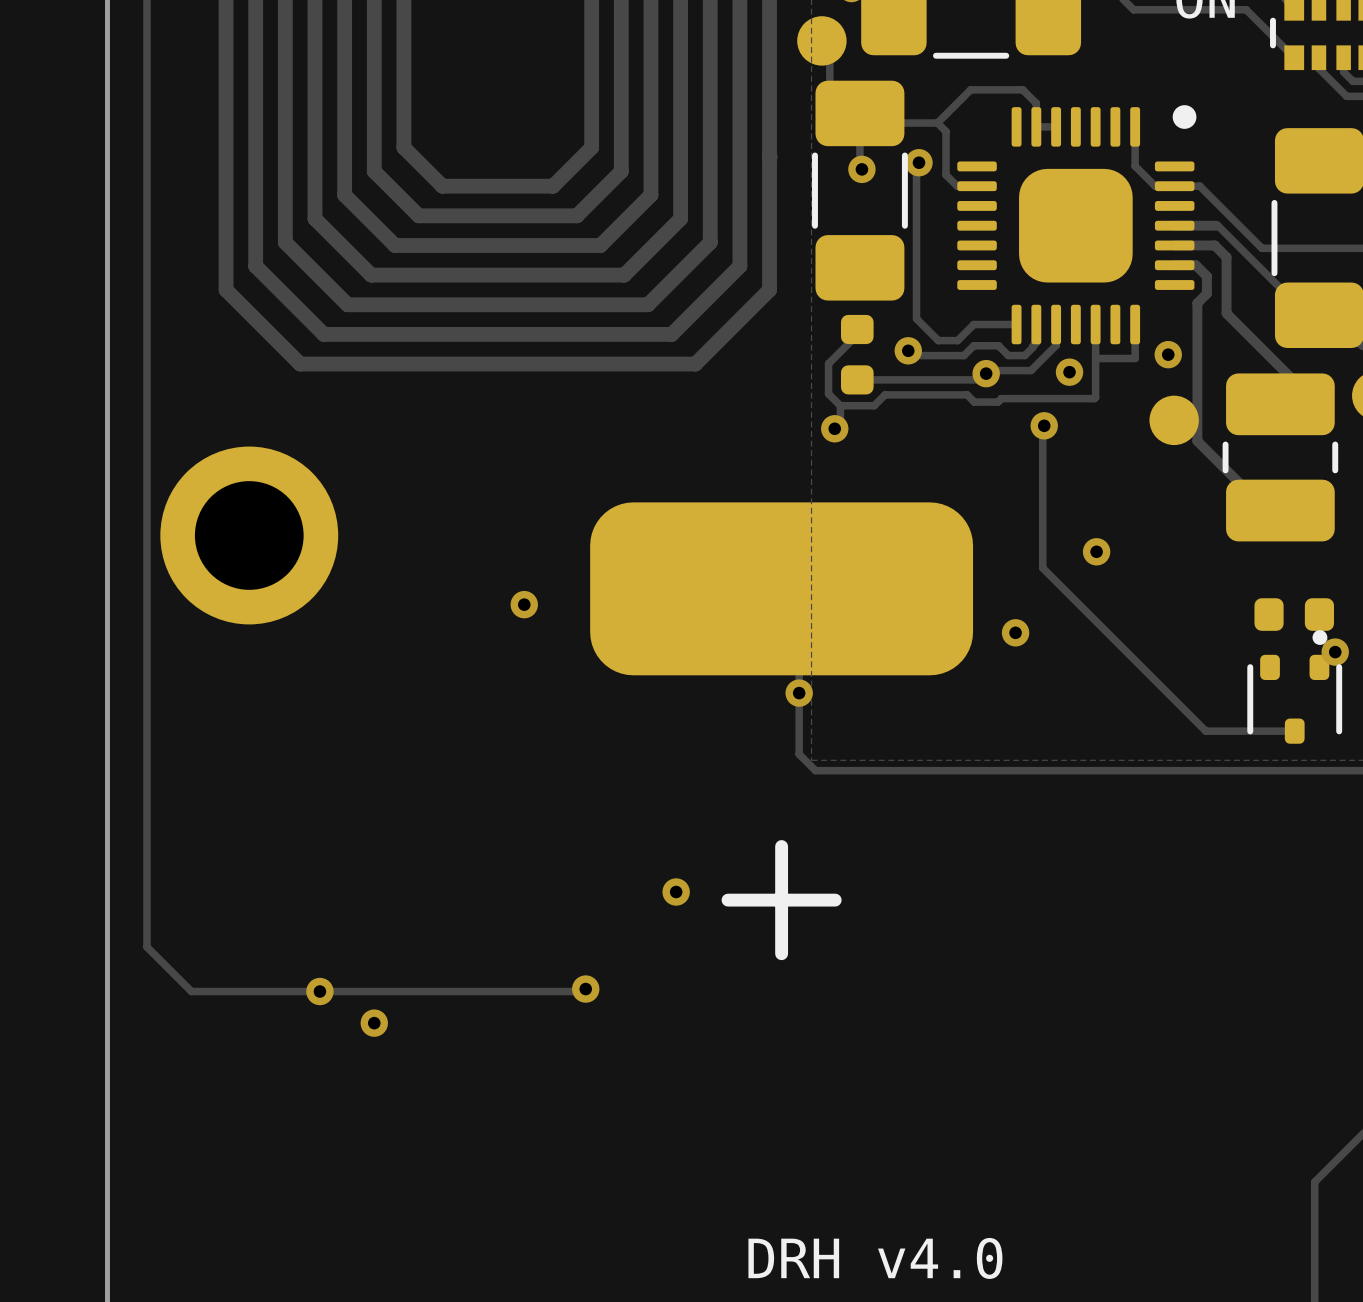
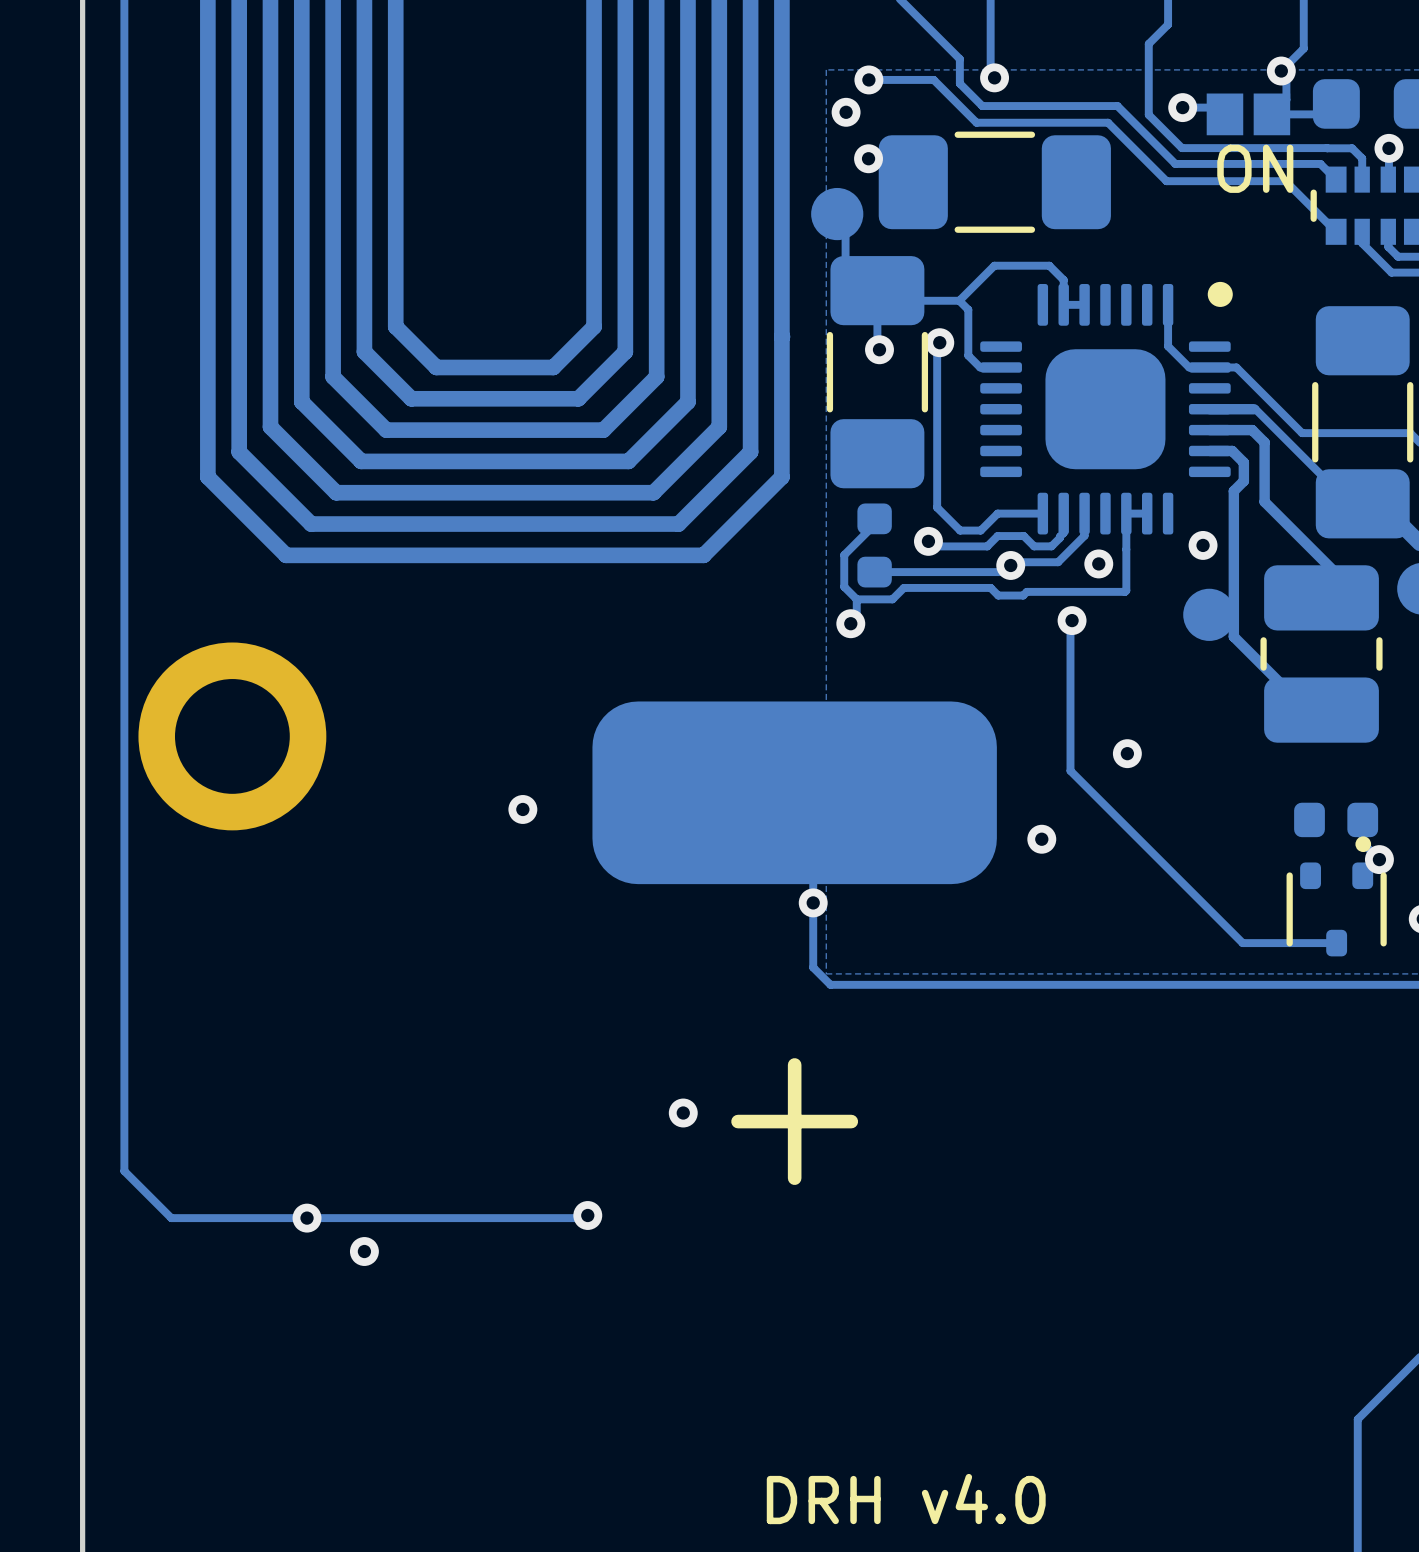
track: none -> (1147, 513) (1126, 513)
track: (1135, 324) (1135, 358) (1095, 358) -> none

